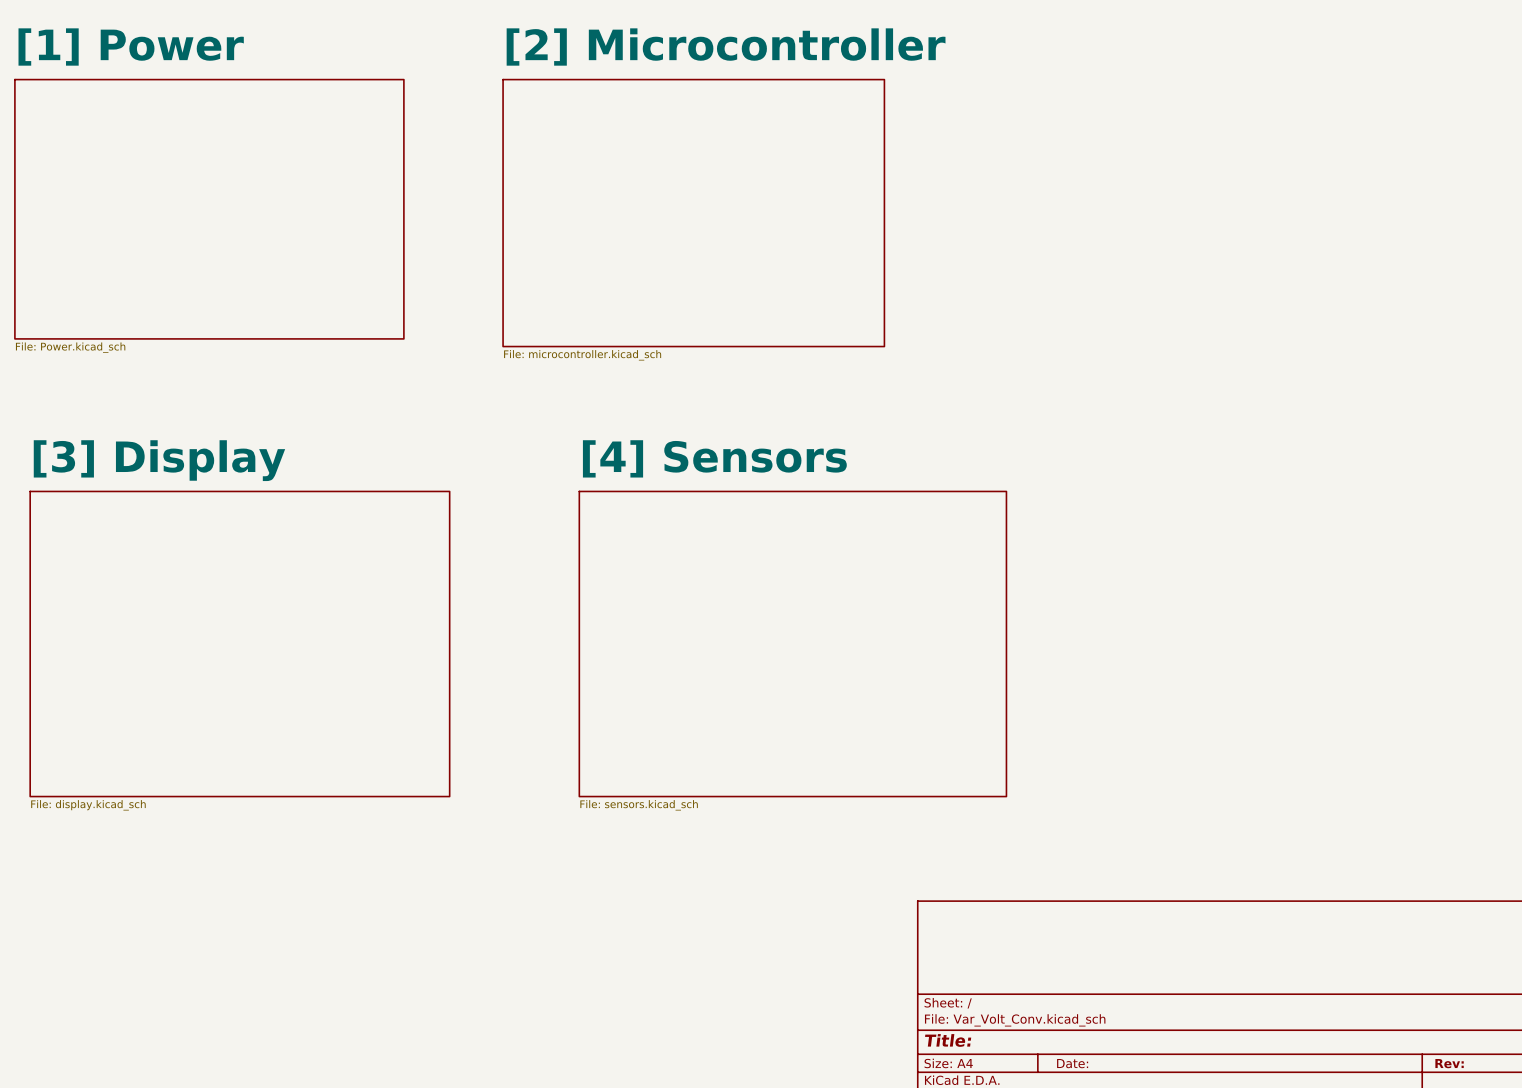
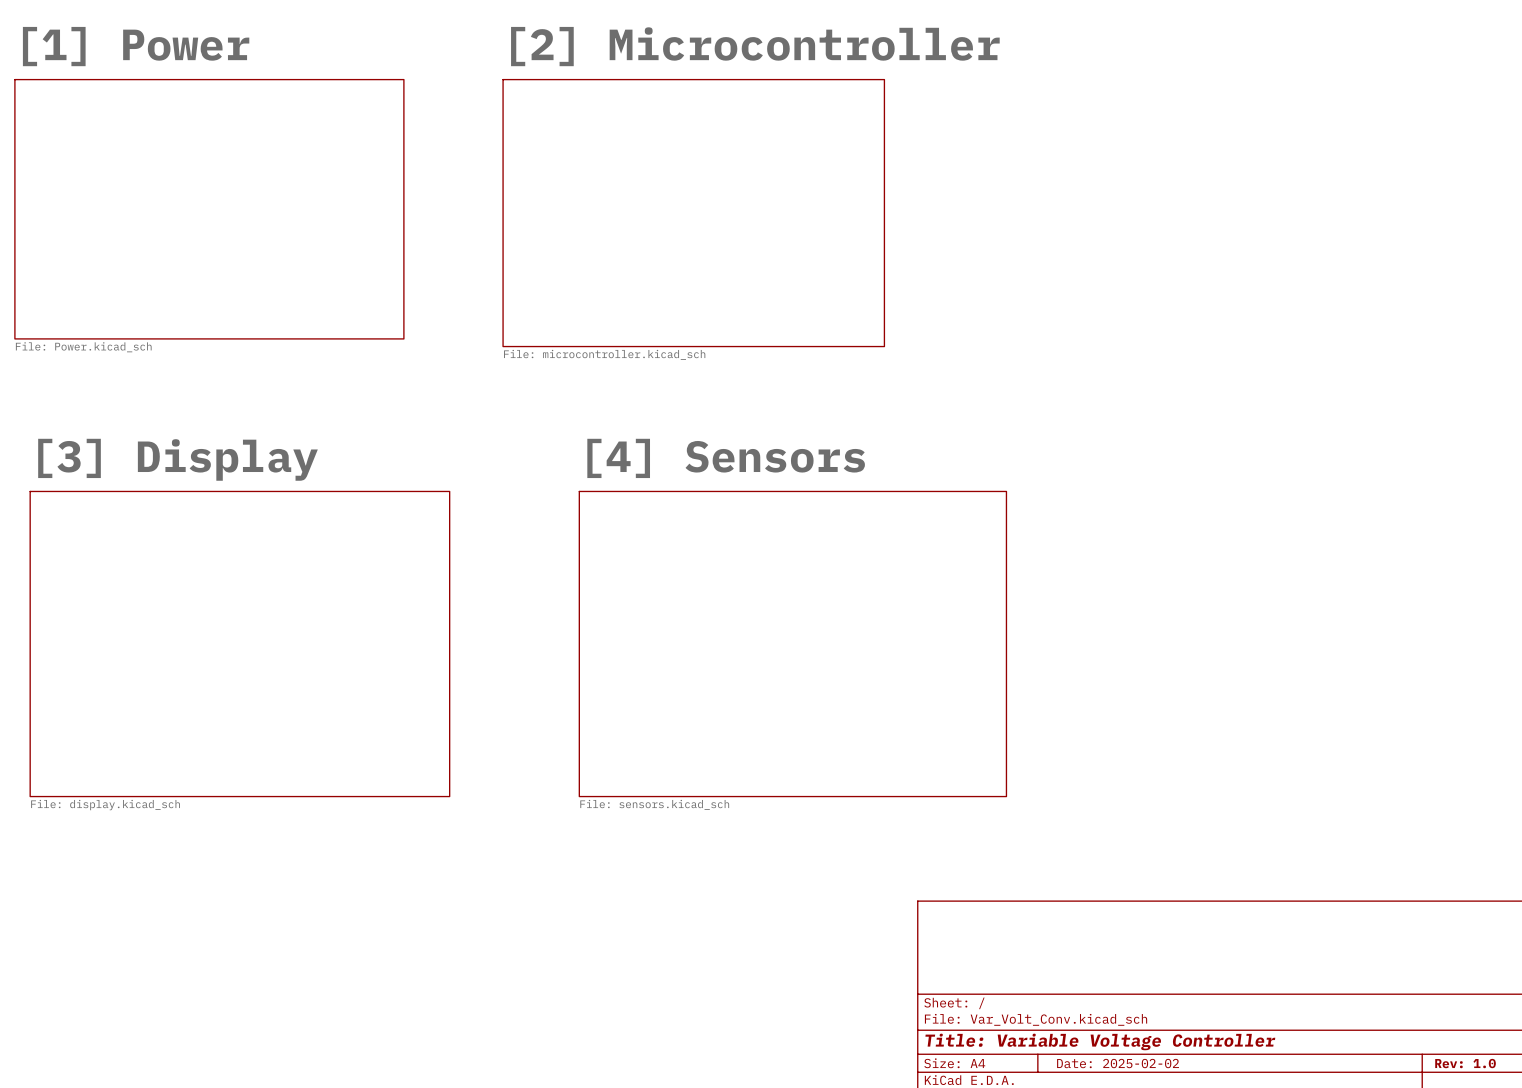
title block: Title: (948, 1040) -> Title: Variable Voltage Controller (1100, 1041)
title block: Date: (1072, 1063) -> Date: 2025-02-02 (1118, 1063)
title block: Rev: (1449, 1063) -> Rev: 1.0 (1465, 1063)

